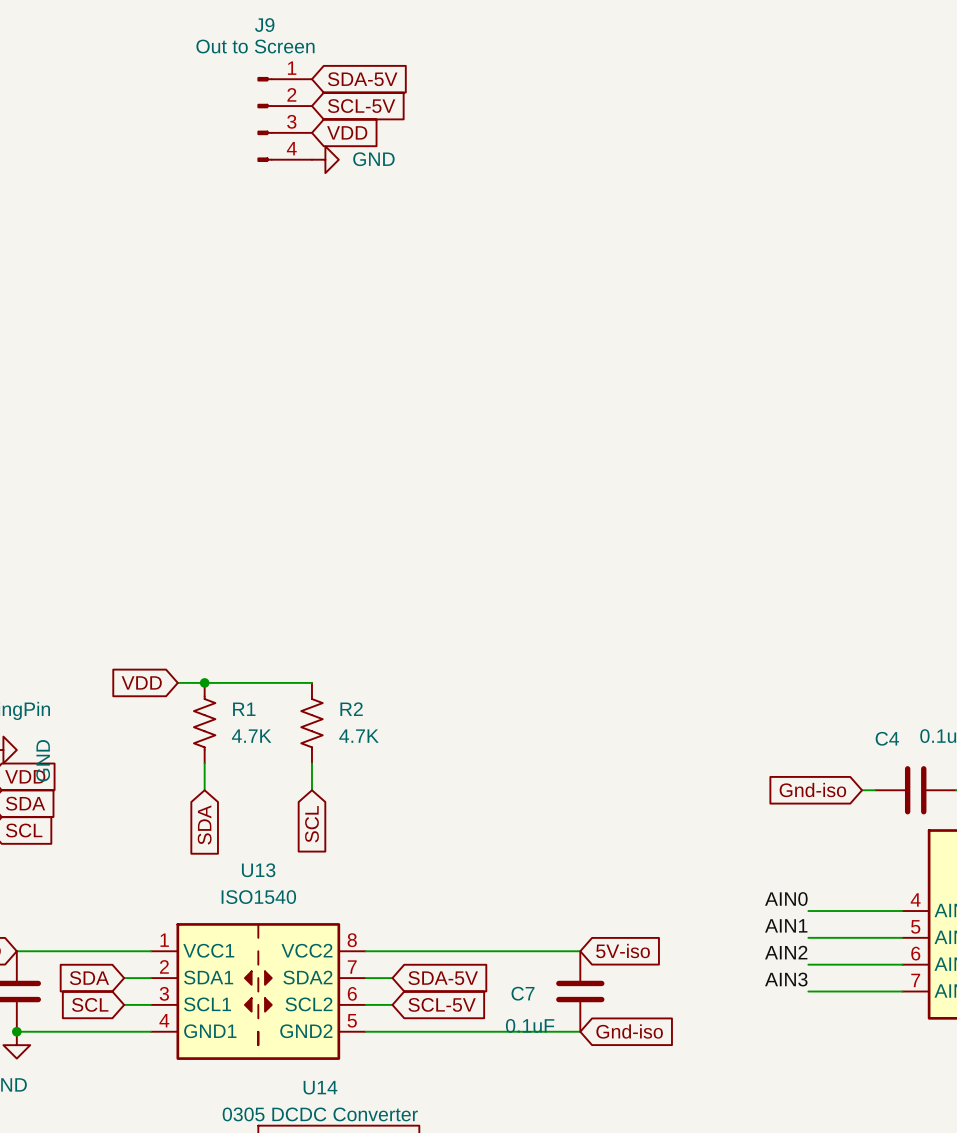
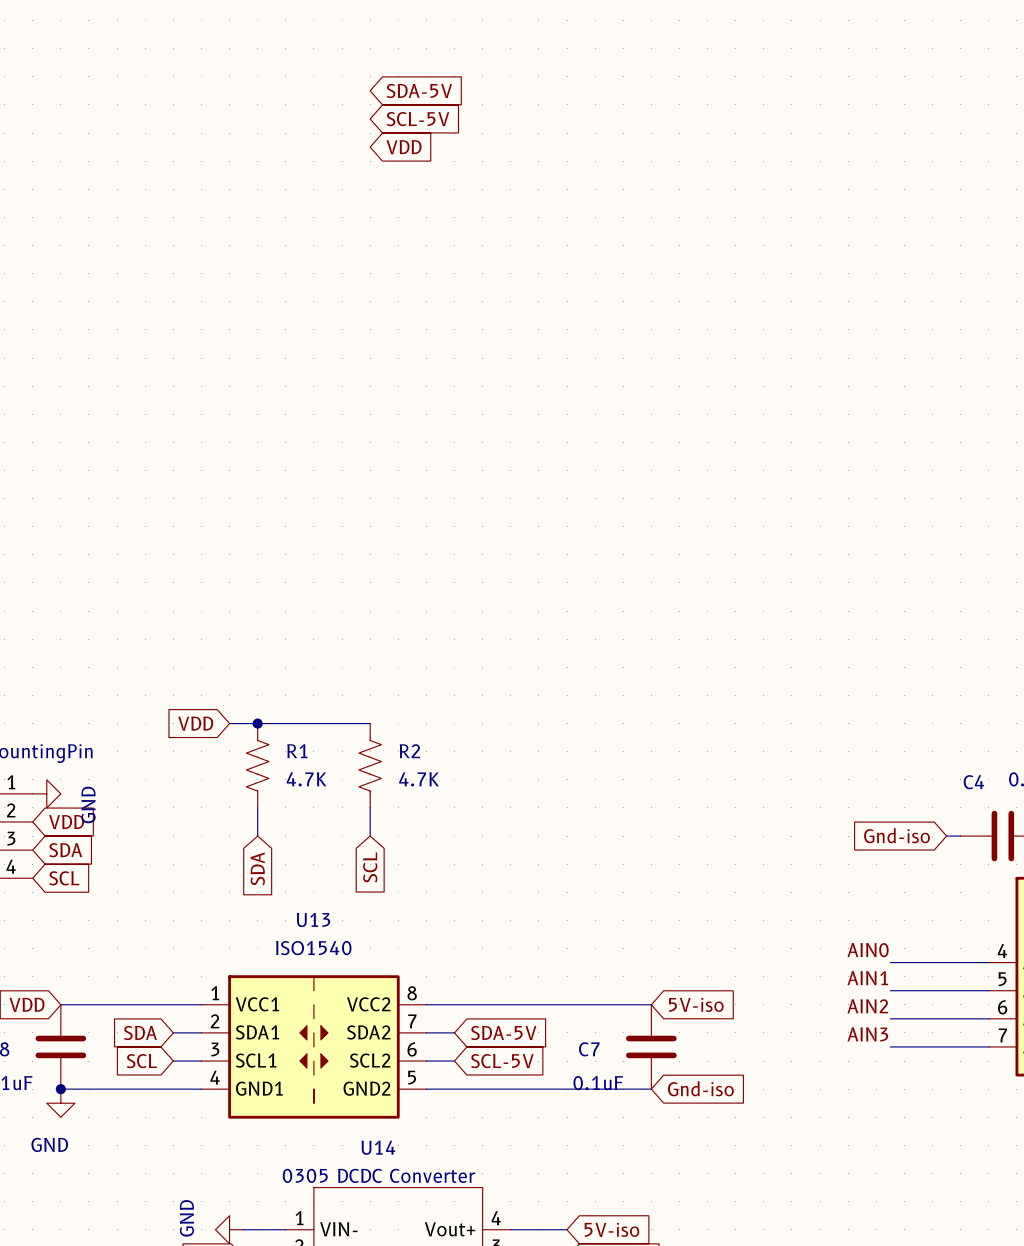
J9: Out to Screen (284, 119) -> none
power symbol: GND (325, 159) -> none

